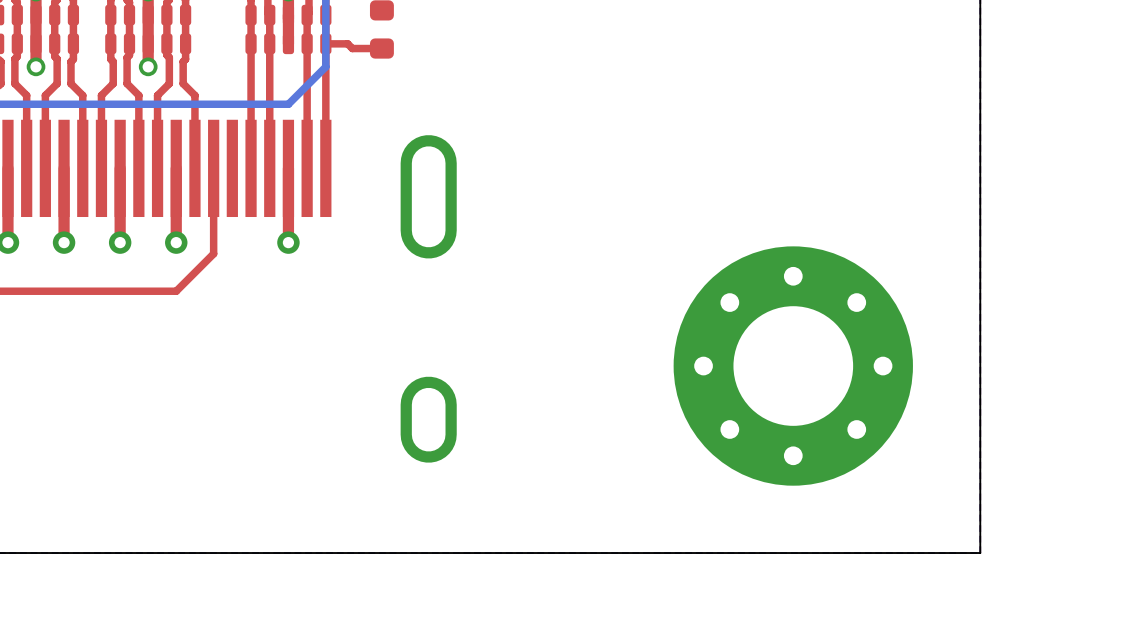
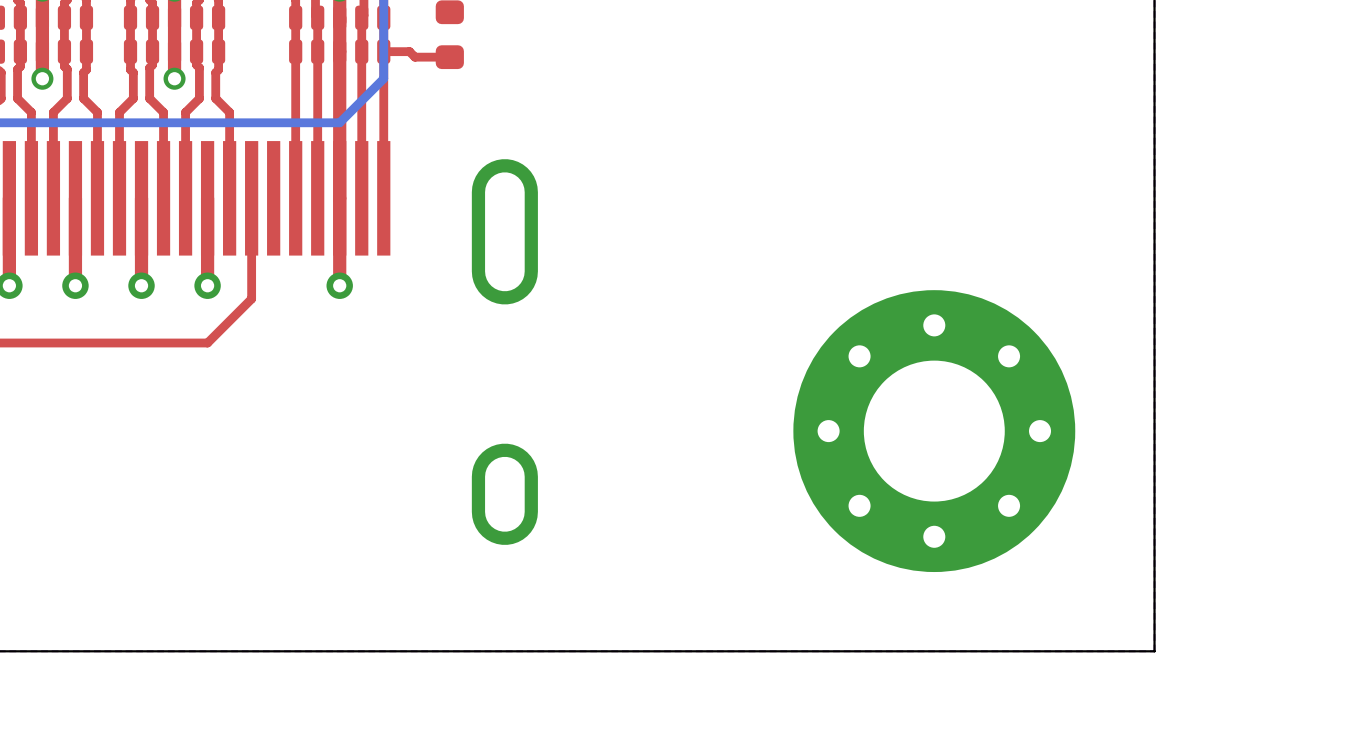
top track: none -> (339, 51) (339, 198)

